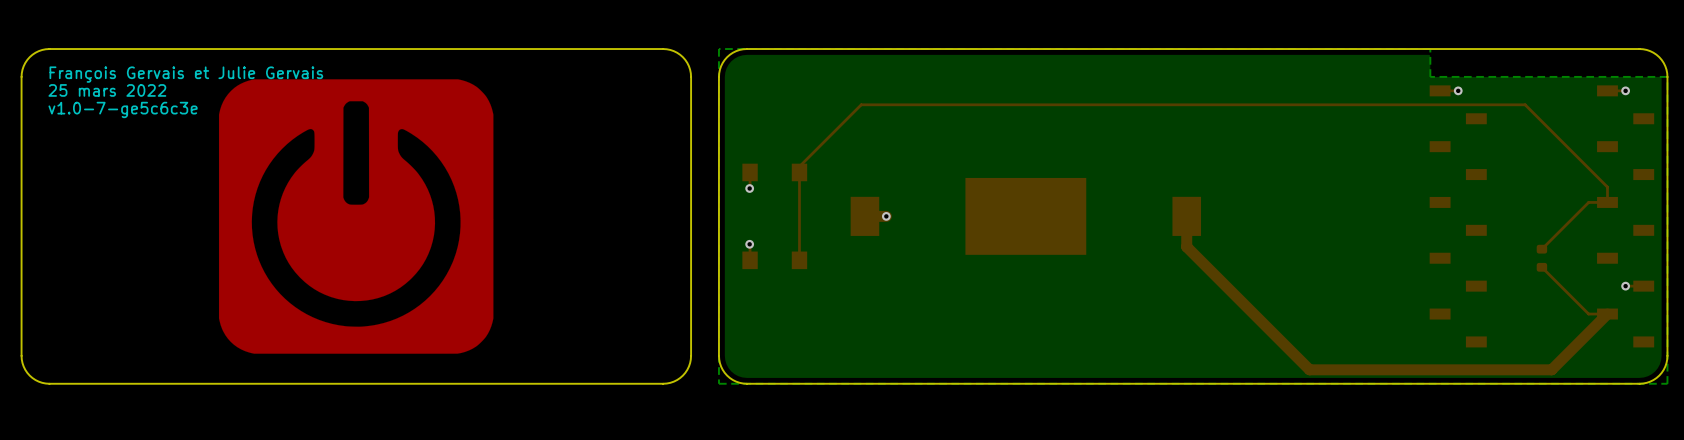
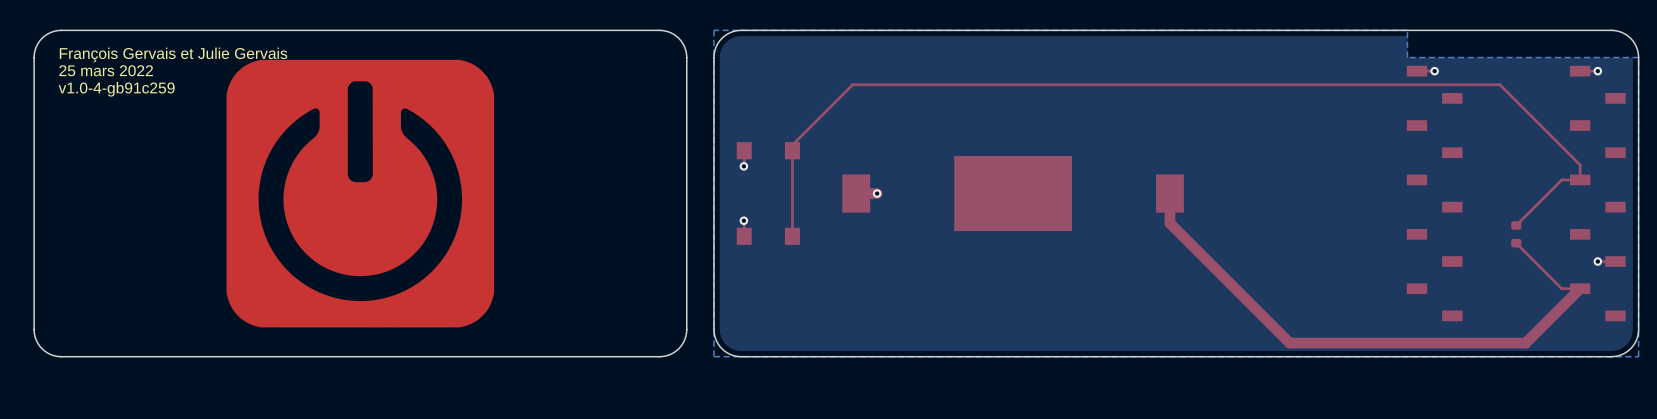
text: v1.0-7-ge5c6c3e (123, 109) -> v1.0-4-gb91c259 (116, 89)

